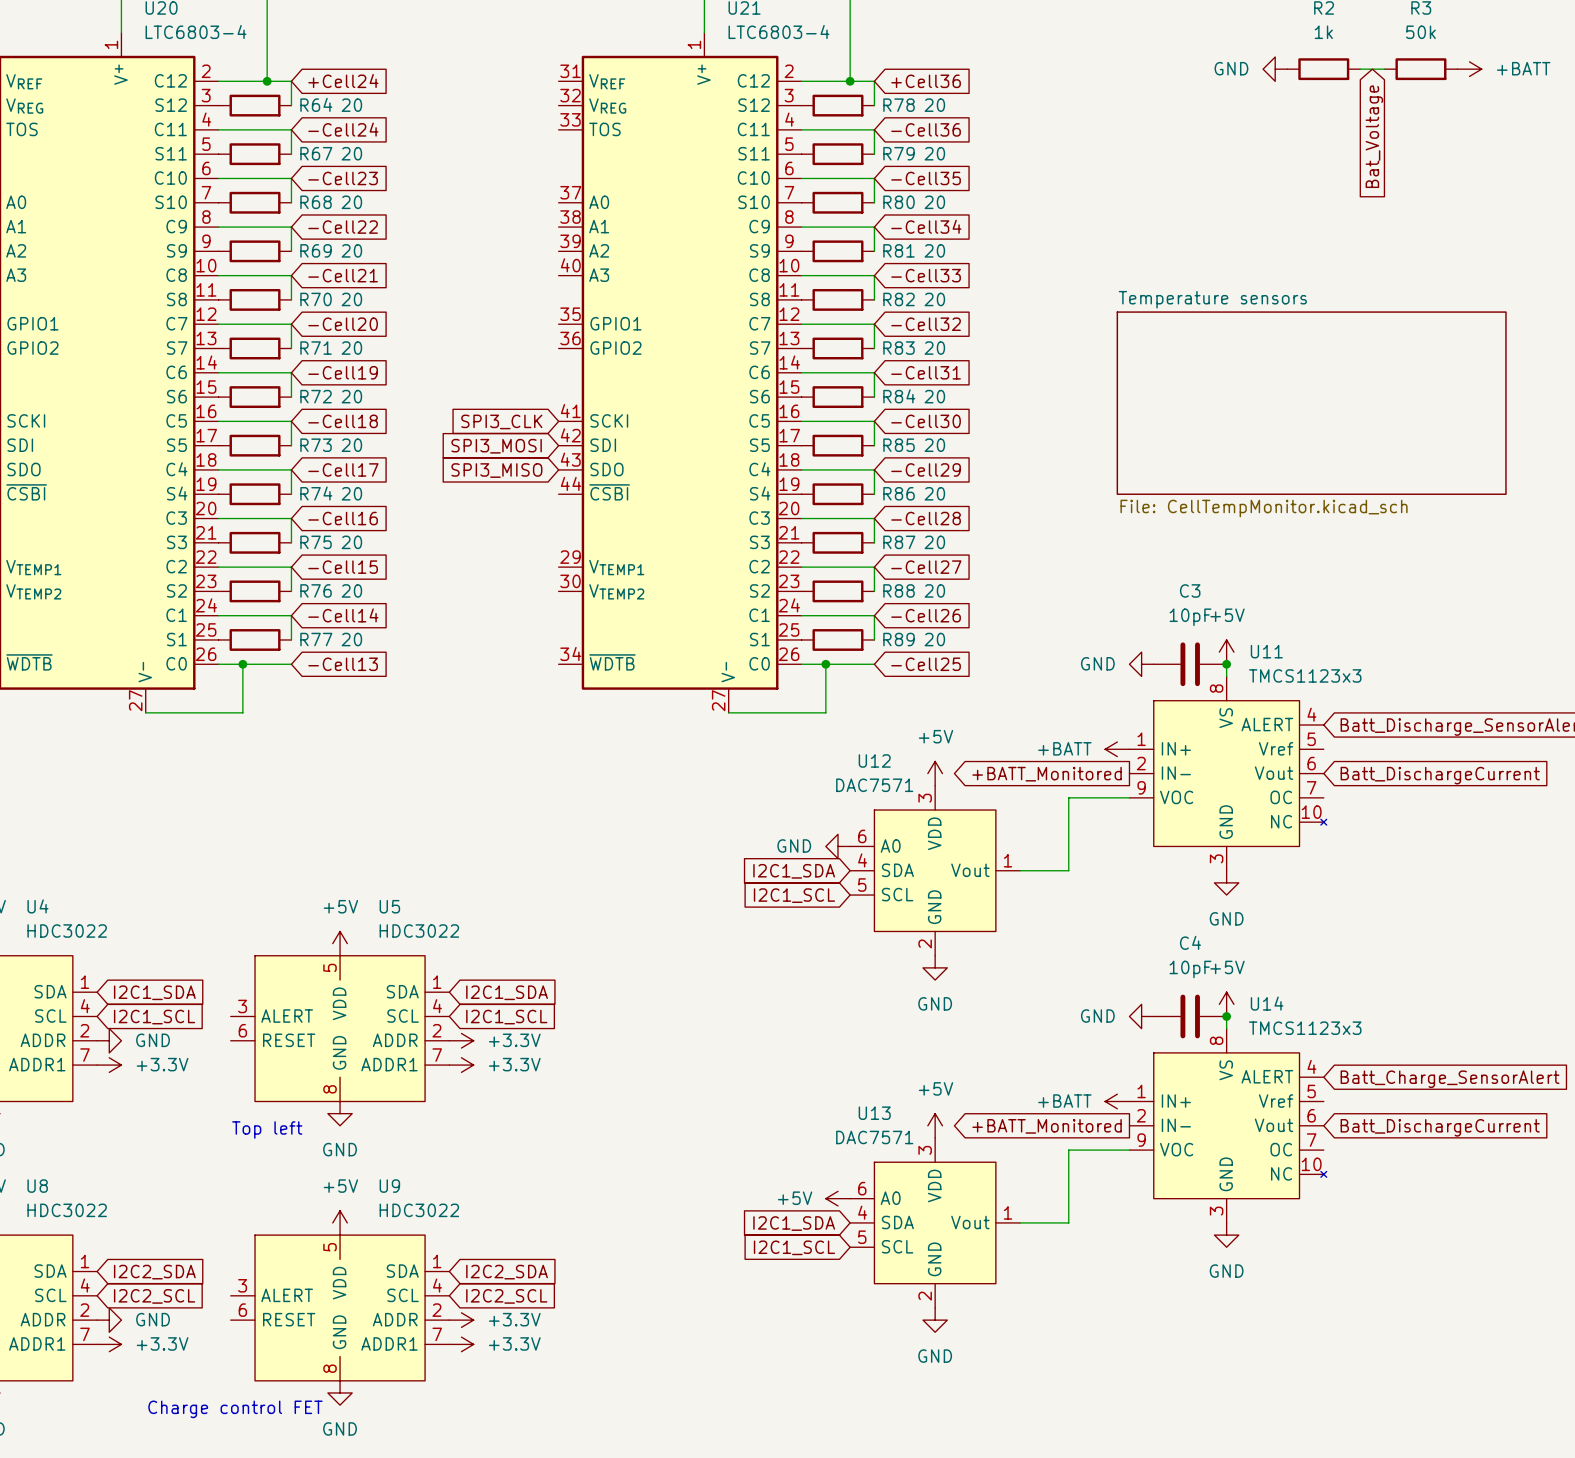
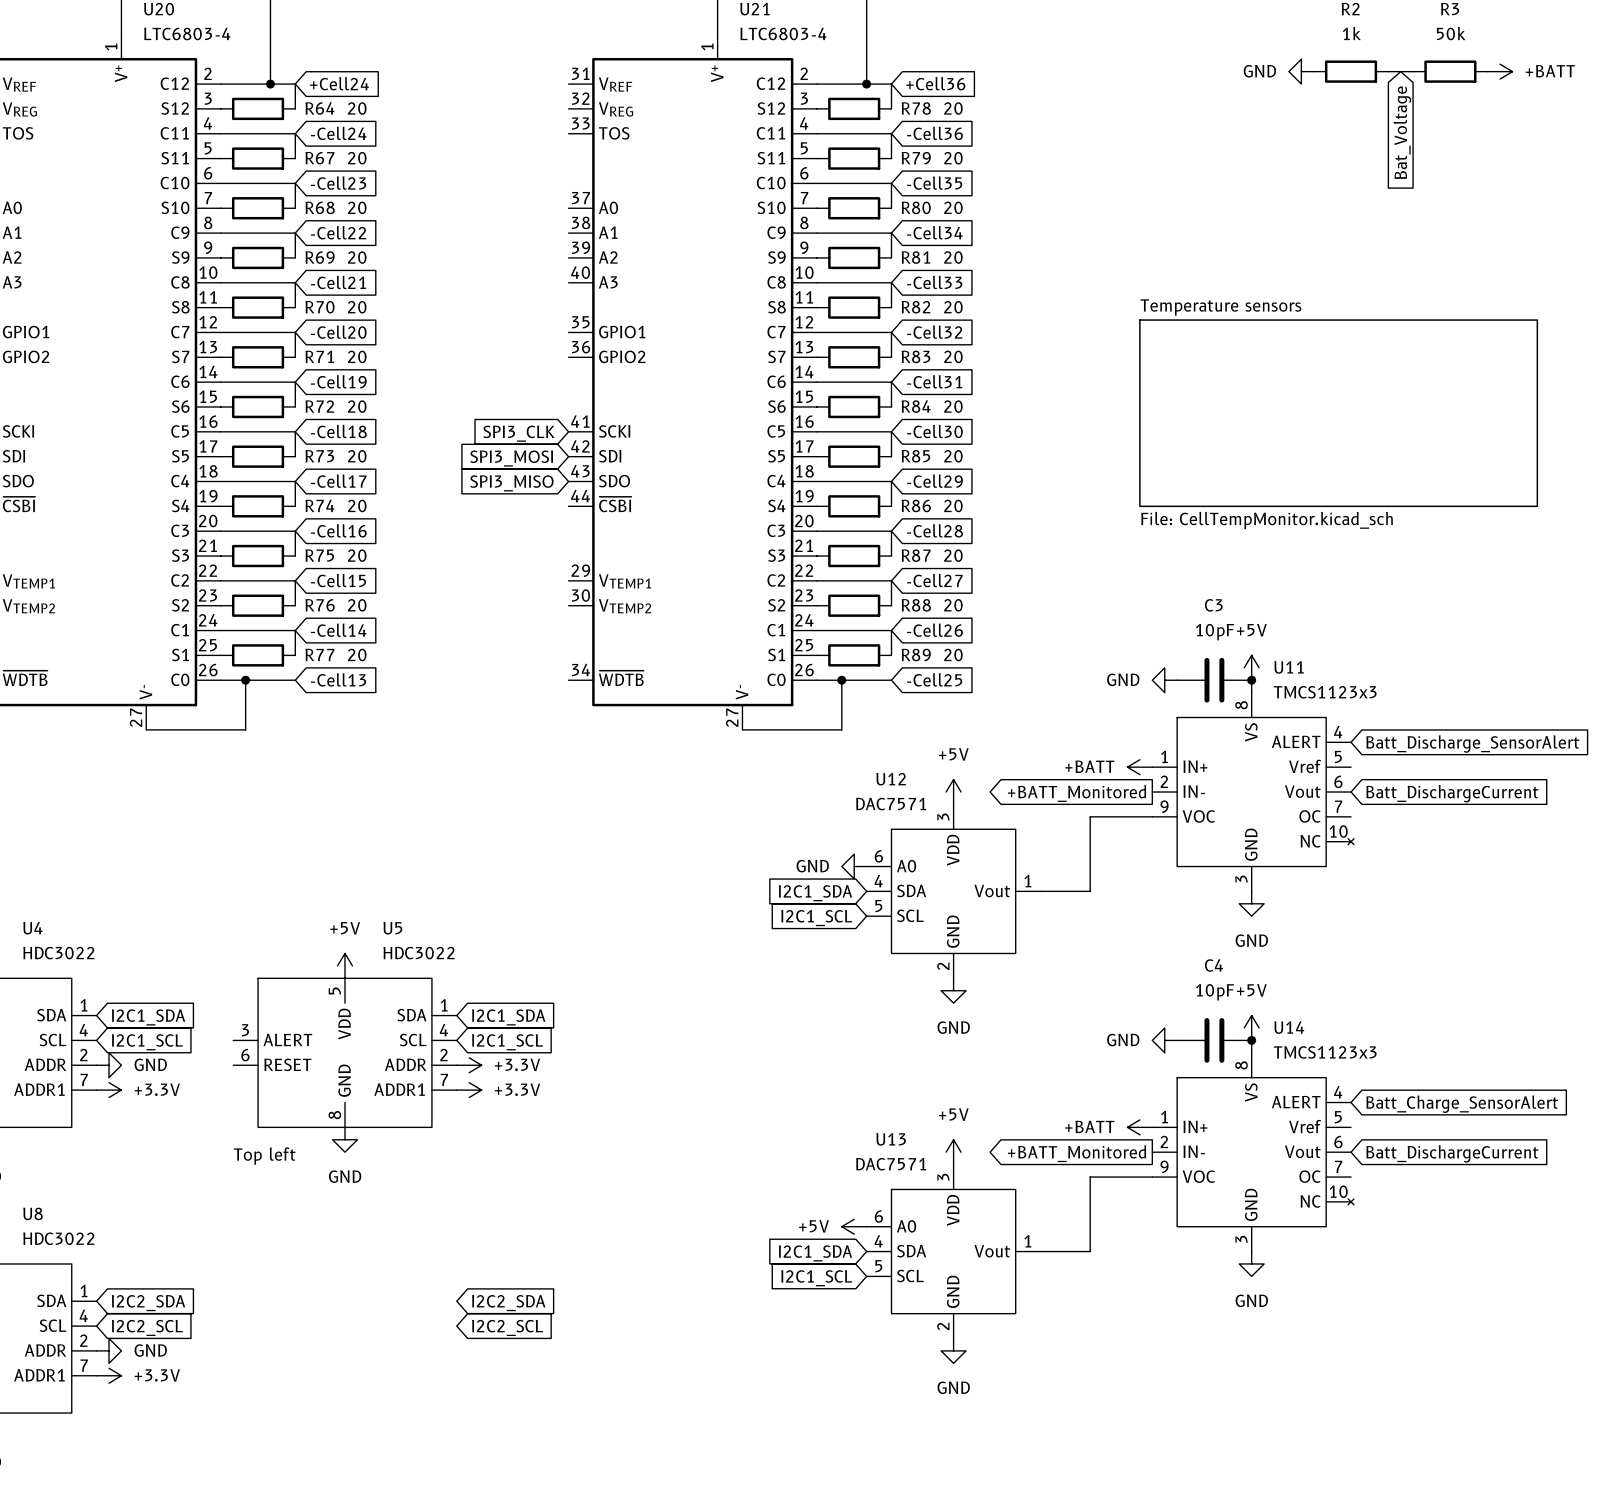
power symbol: +5V (340, 1222) -> none
U9: HDC3022 (340, 1307) -> none
power symbol: +3.3V (461, 1320) -> none
power symbol: +3.3V (461, 1344) -> none
power symbol: GND (340, 1392) -> none
text: Charge control FET (235, 1409) -> none

